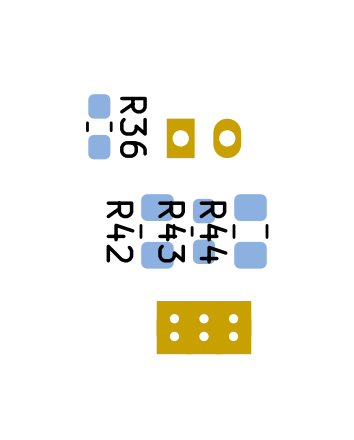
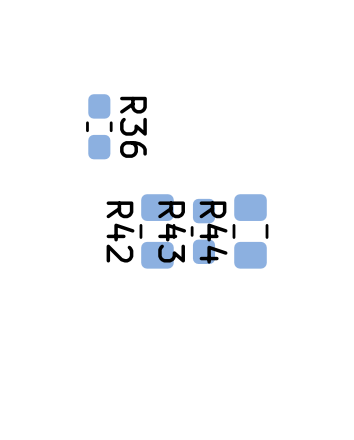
part: (203, 138) -> none
part: (203, 327) -> none

